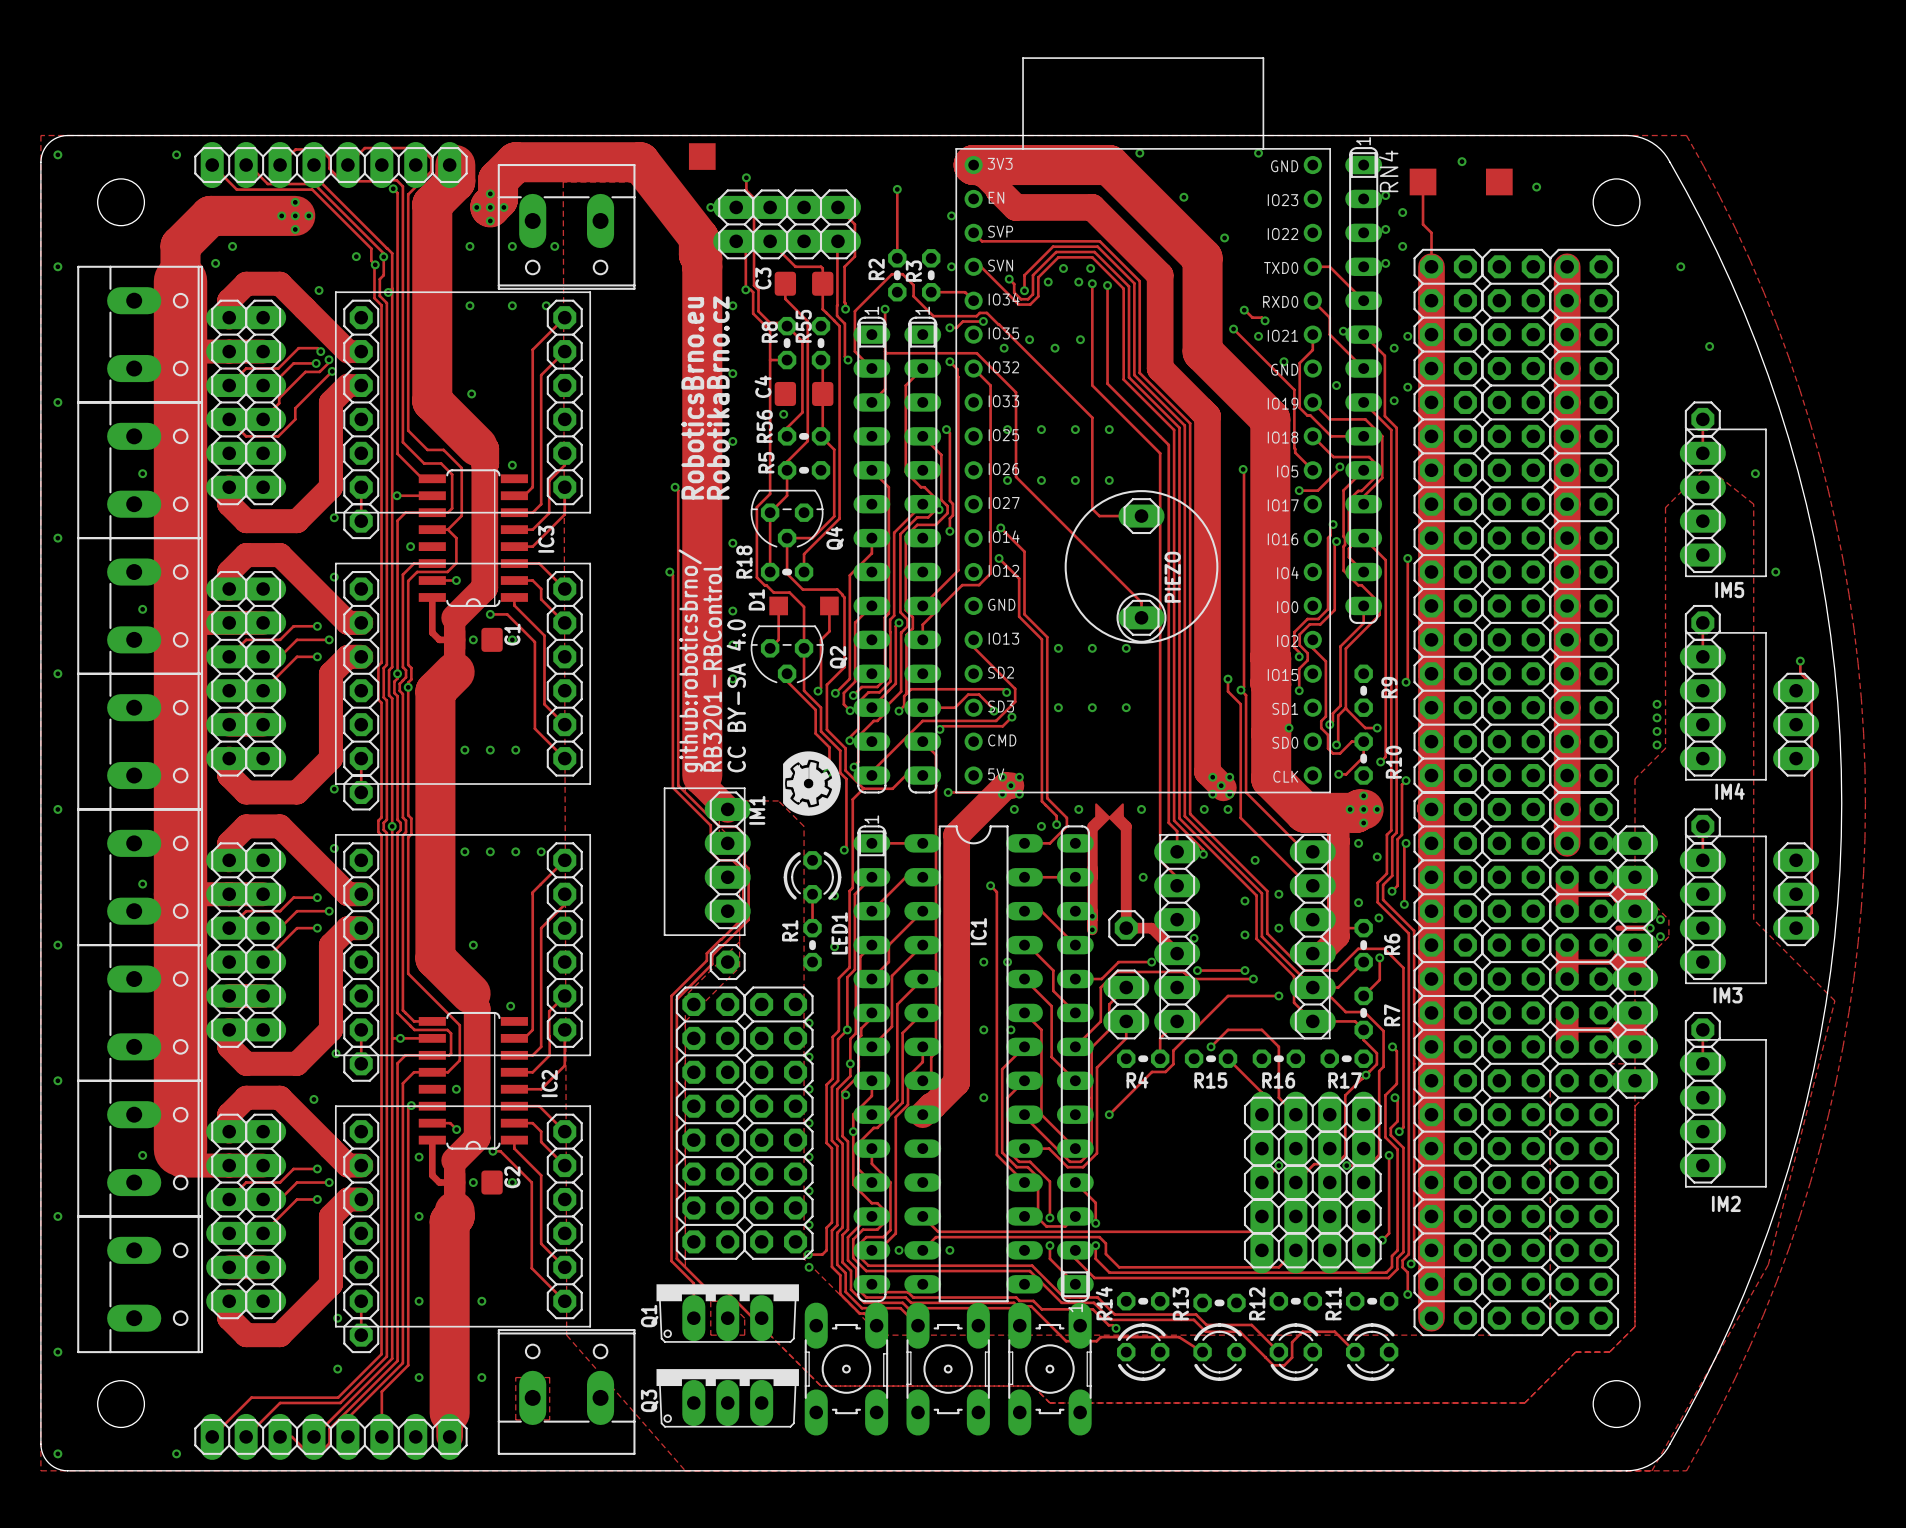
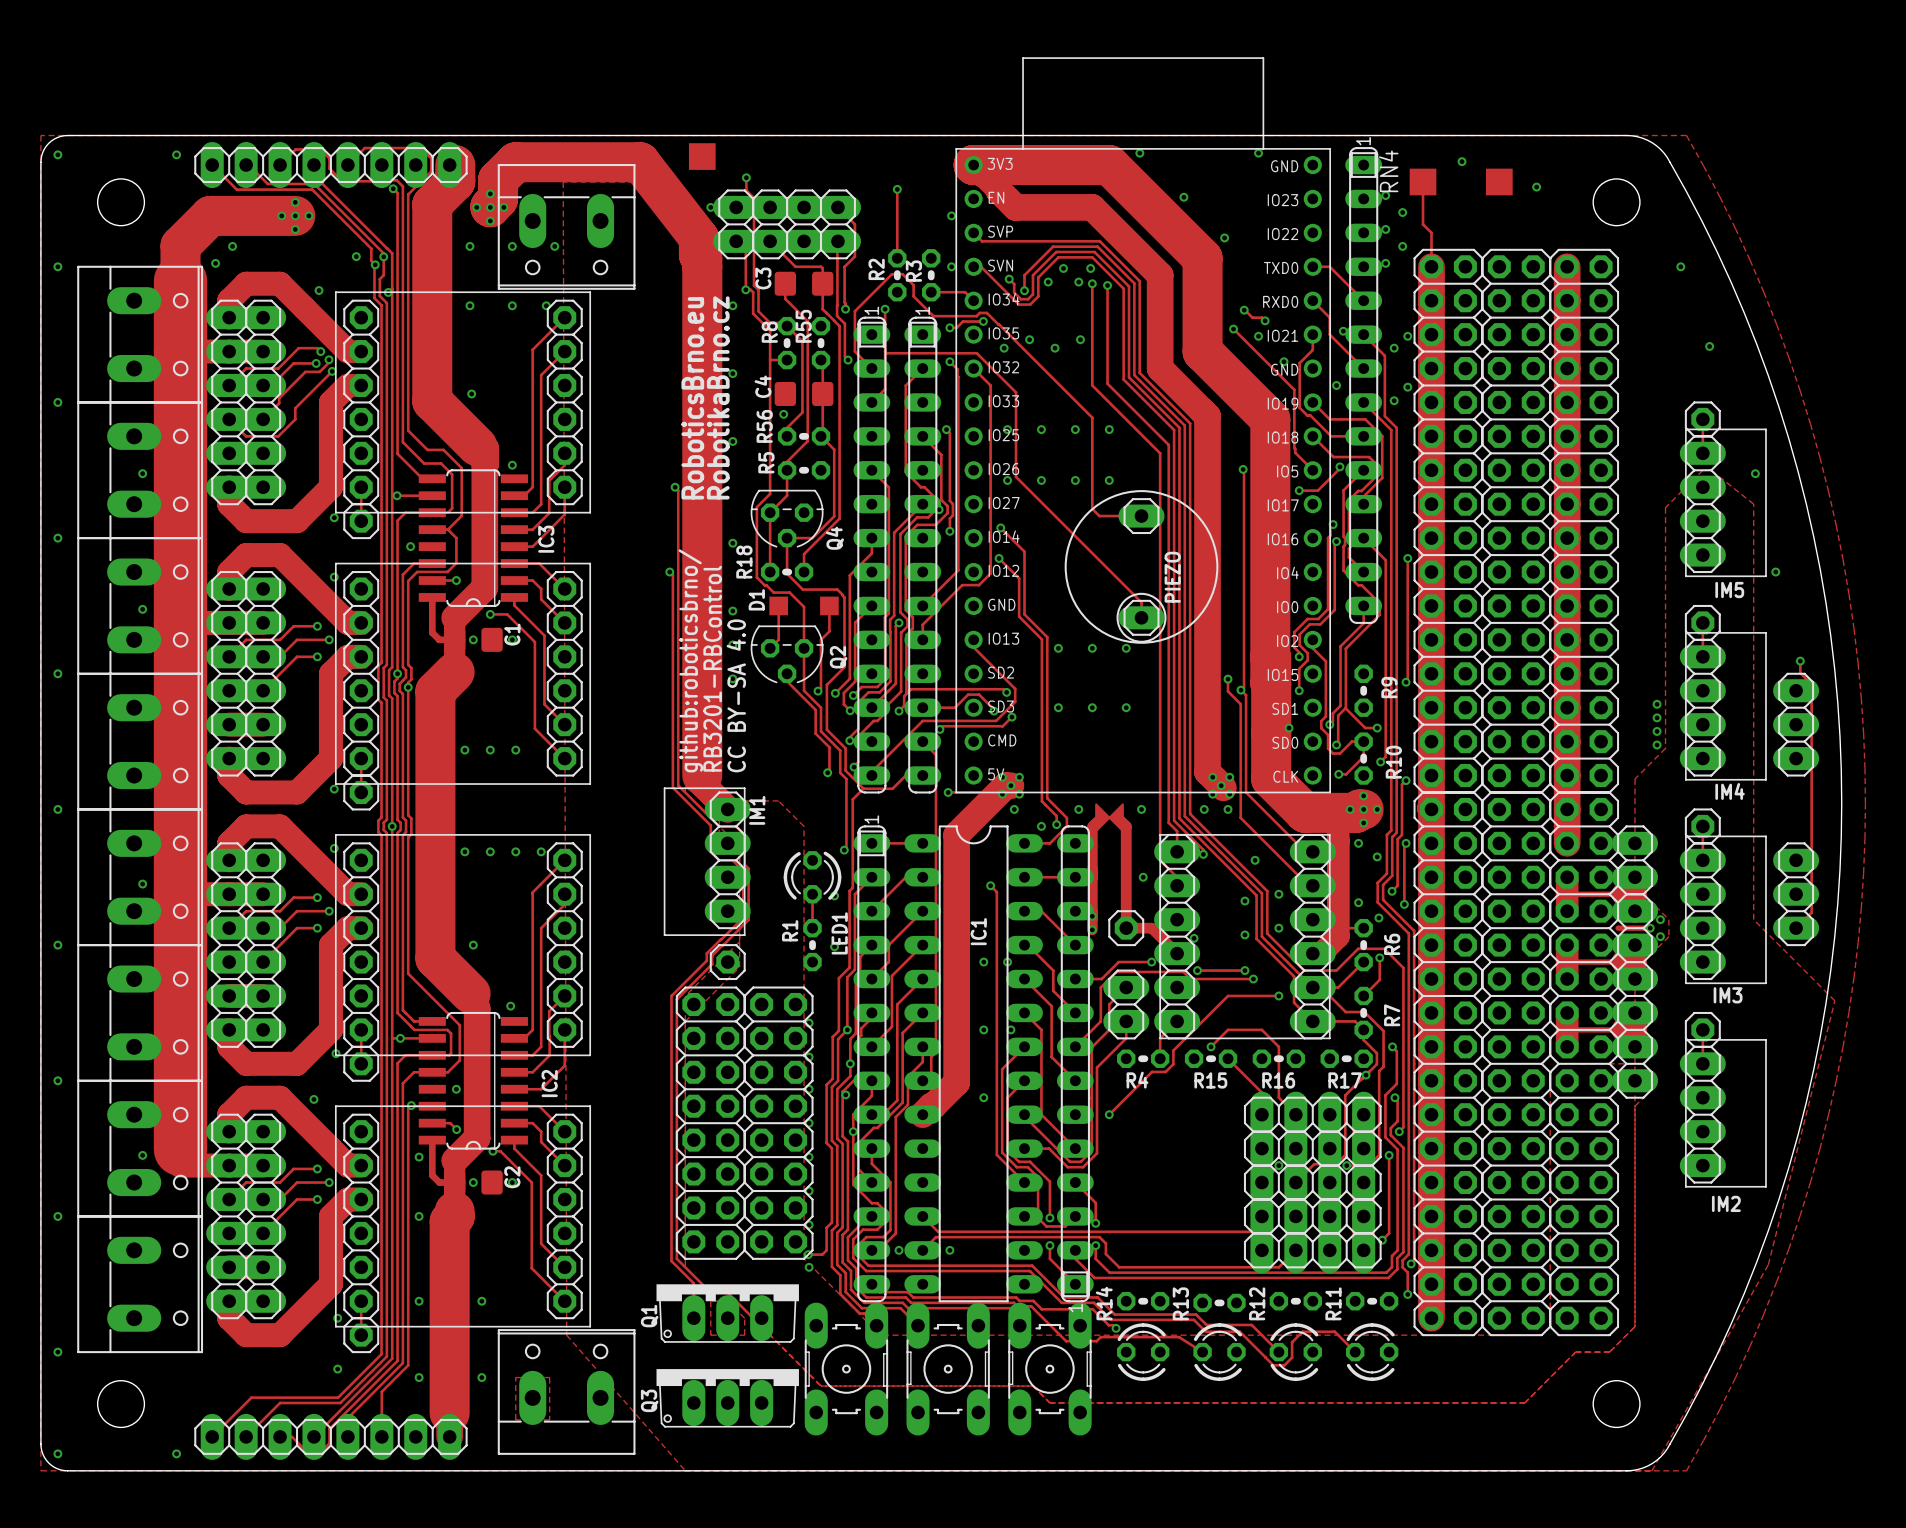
drawing: [783, 751, 841, 816] -> none

